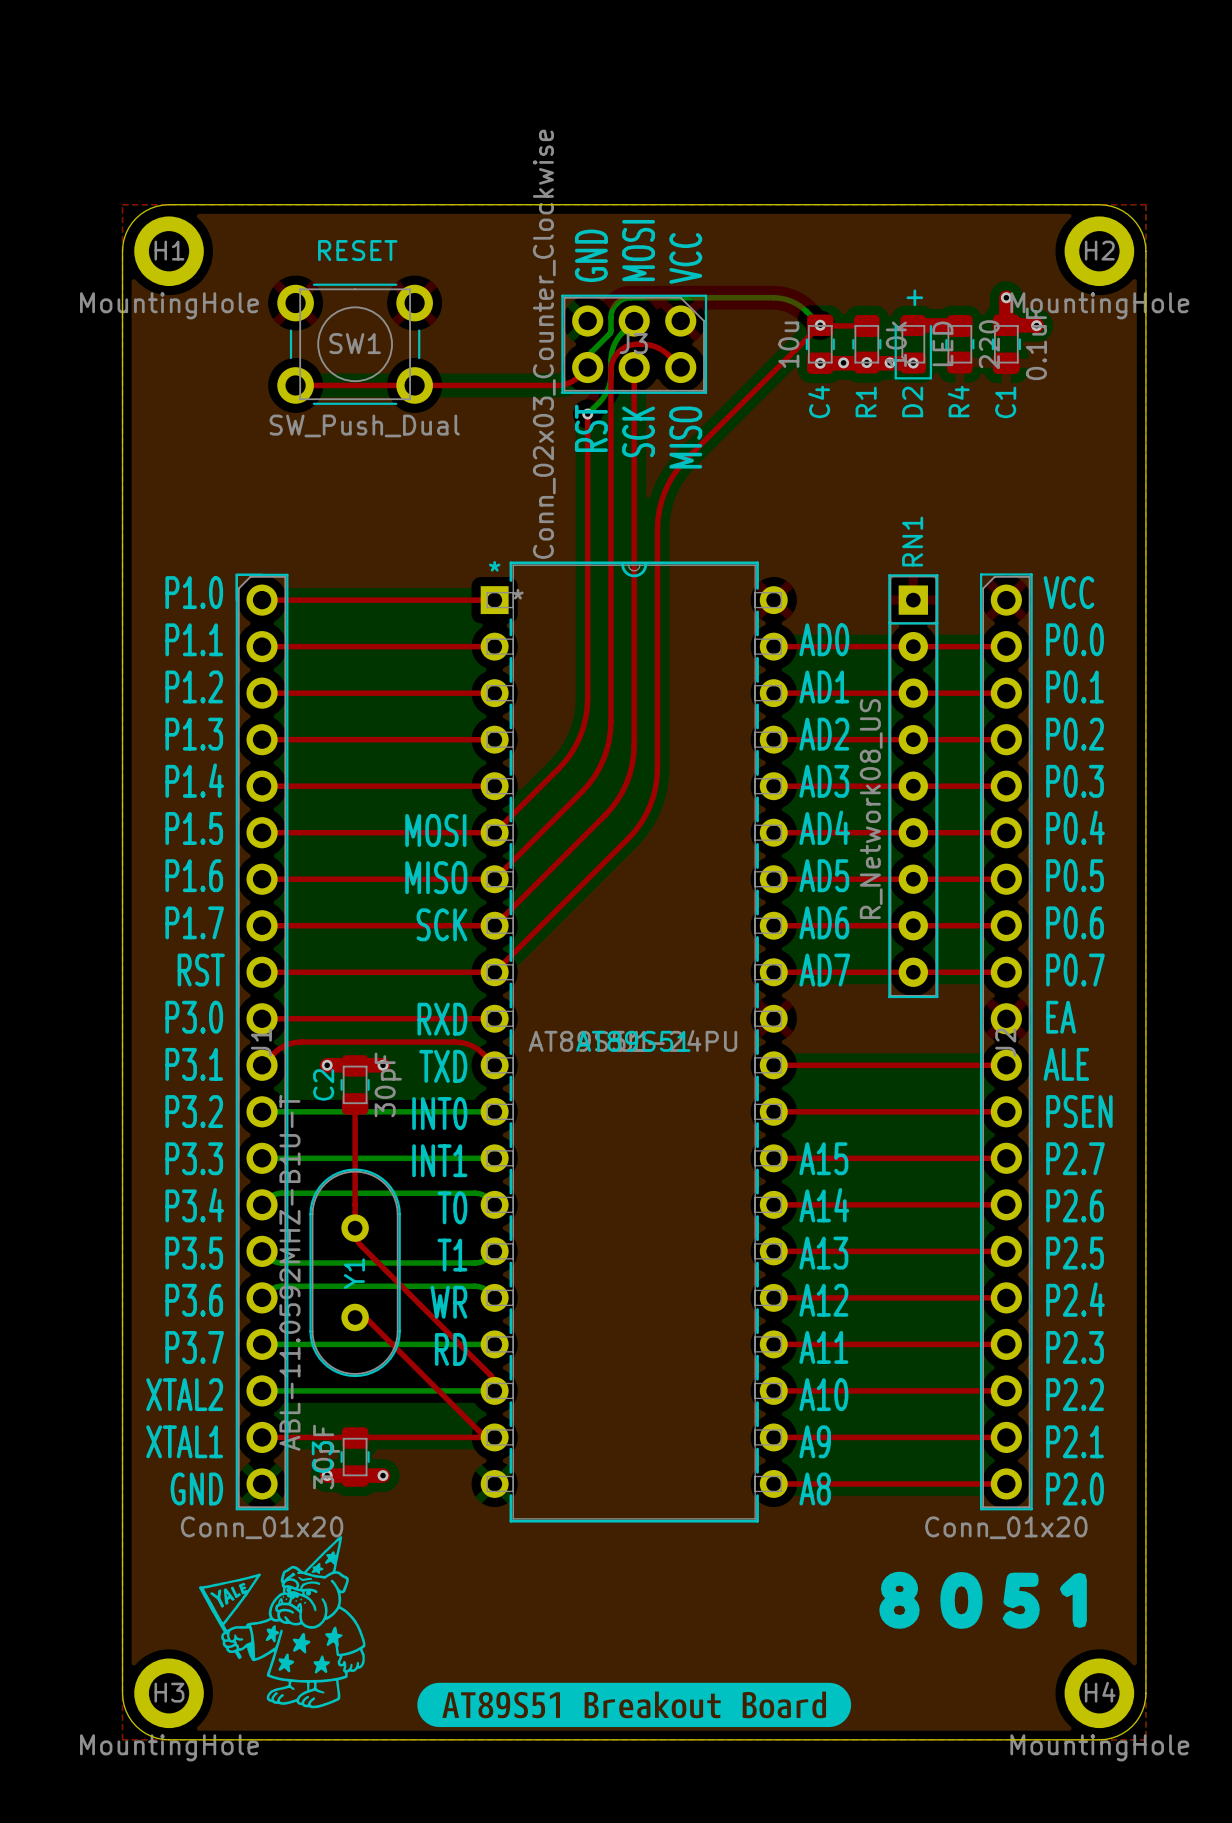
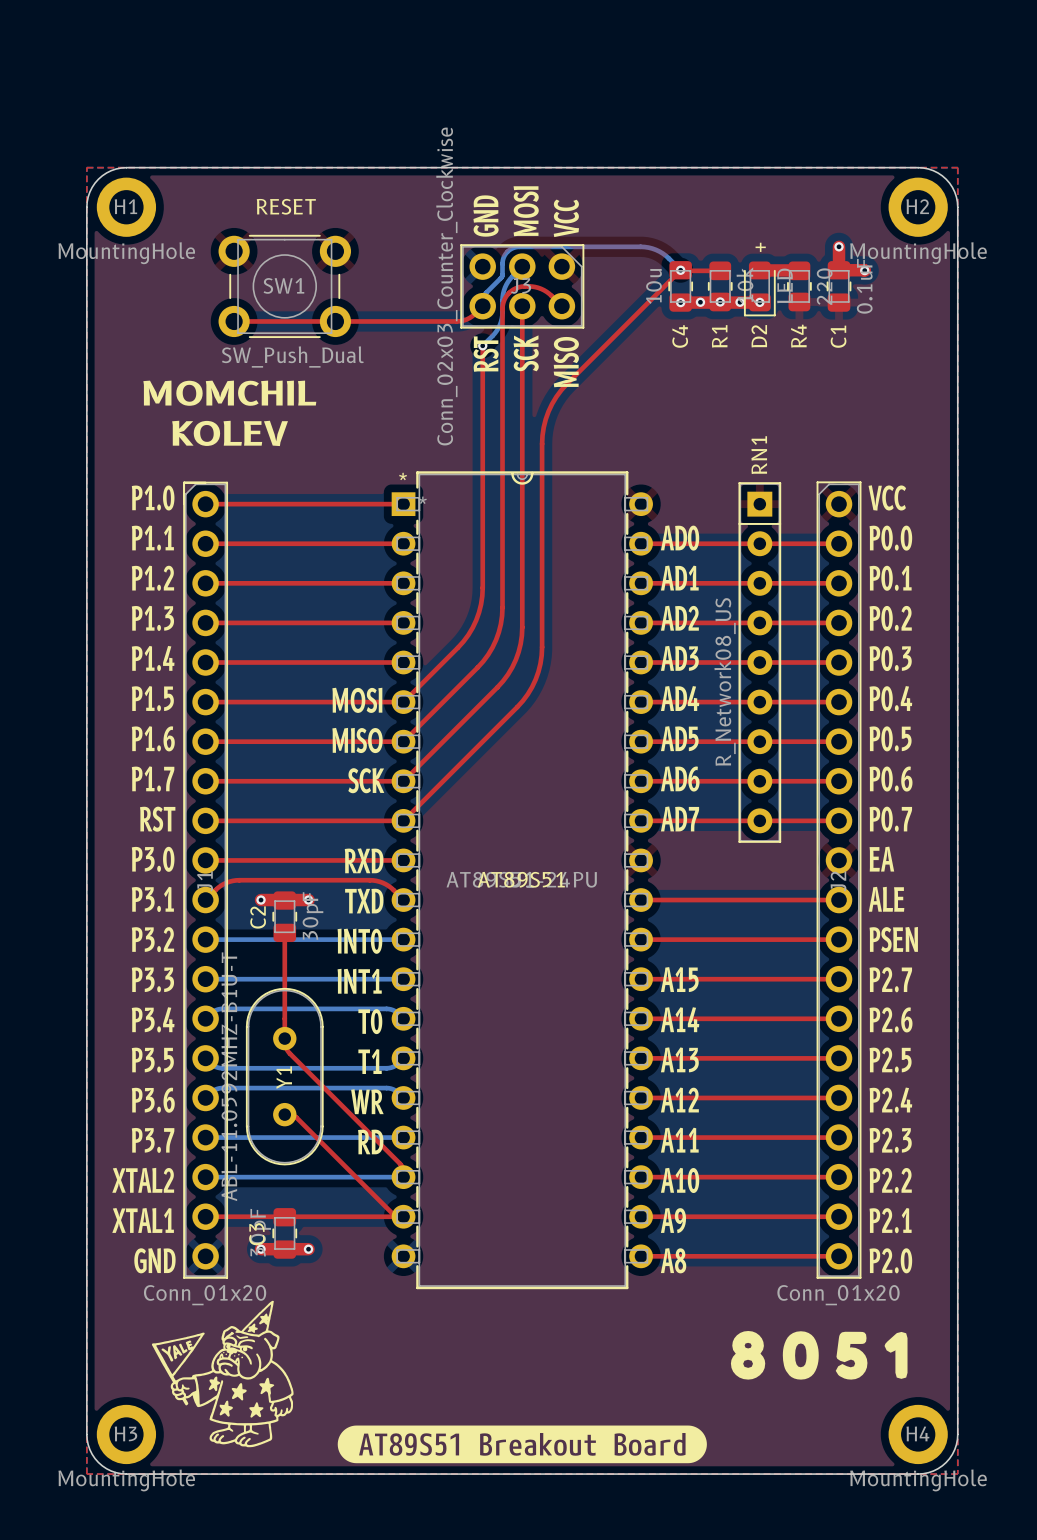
text: none -> MOMCHIL (229, 393)
text: none -> KOLEV (230, 433)

